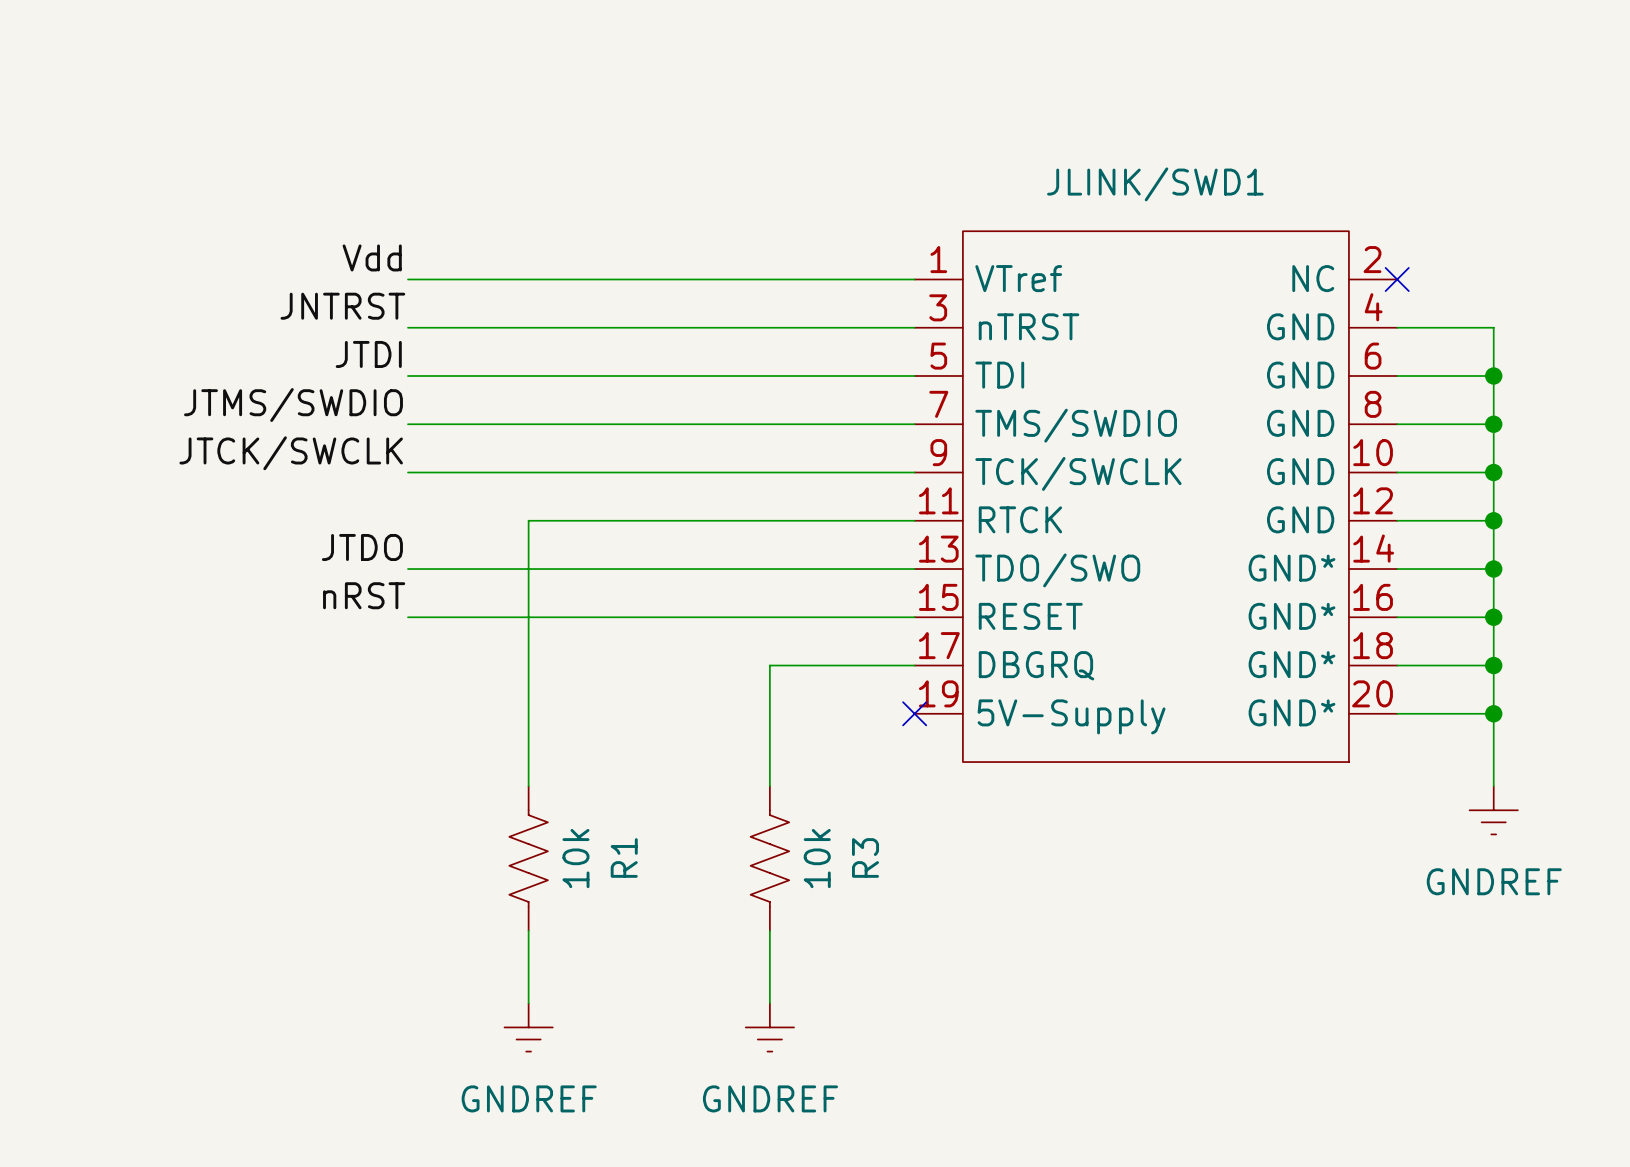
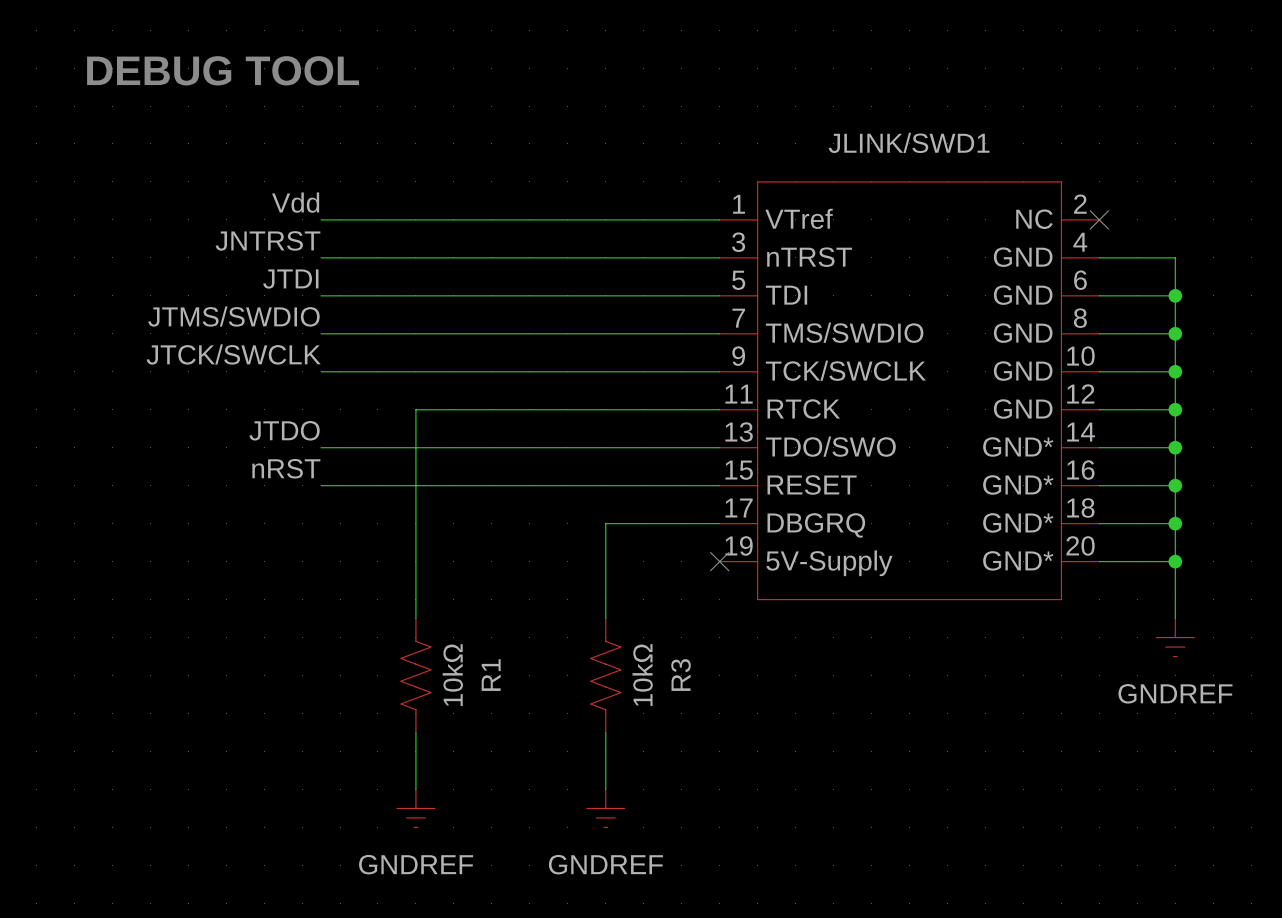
text: none -> DEBUG TOOL (223, 70)
R1 value: 10k (575, 858) -> 10kΩ (452, 675)
R3 value: 10k (817, 858) -> 10kΩ (642, 675)

